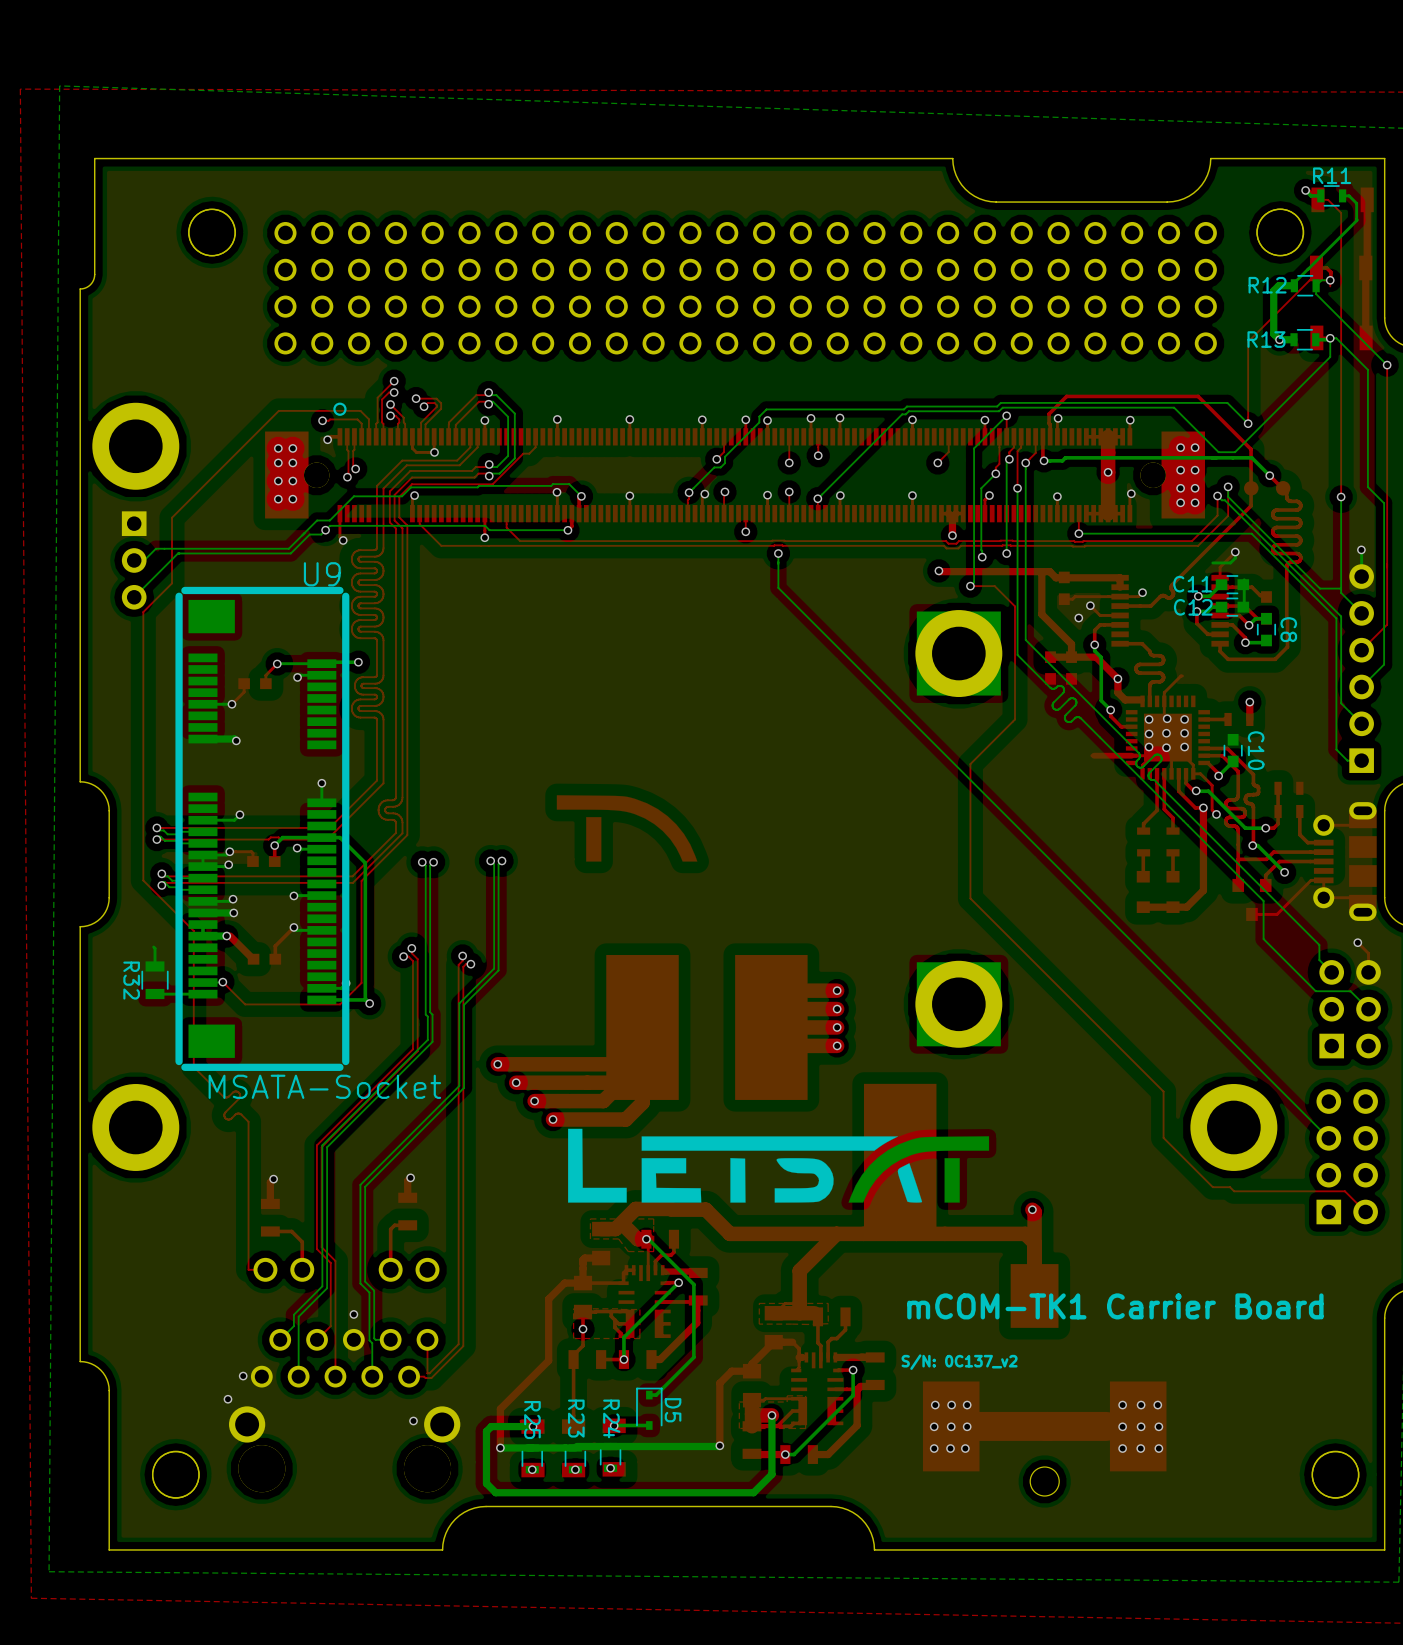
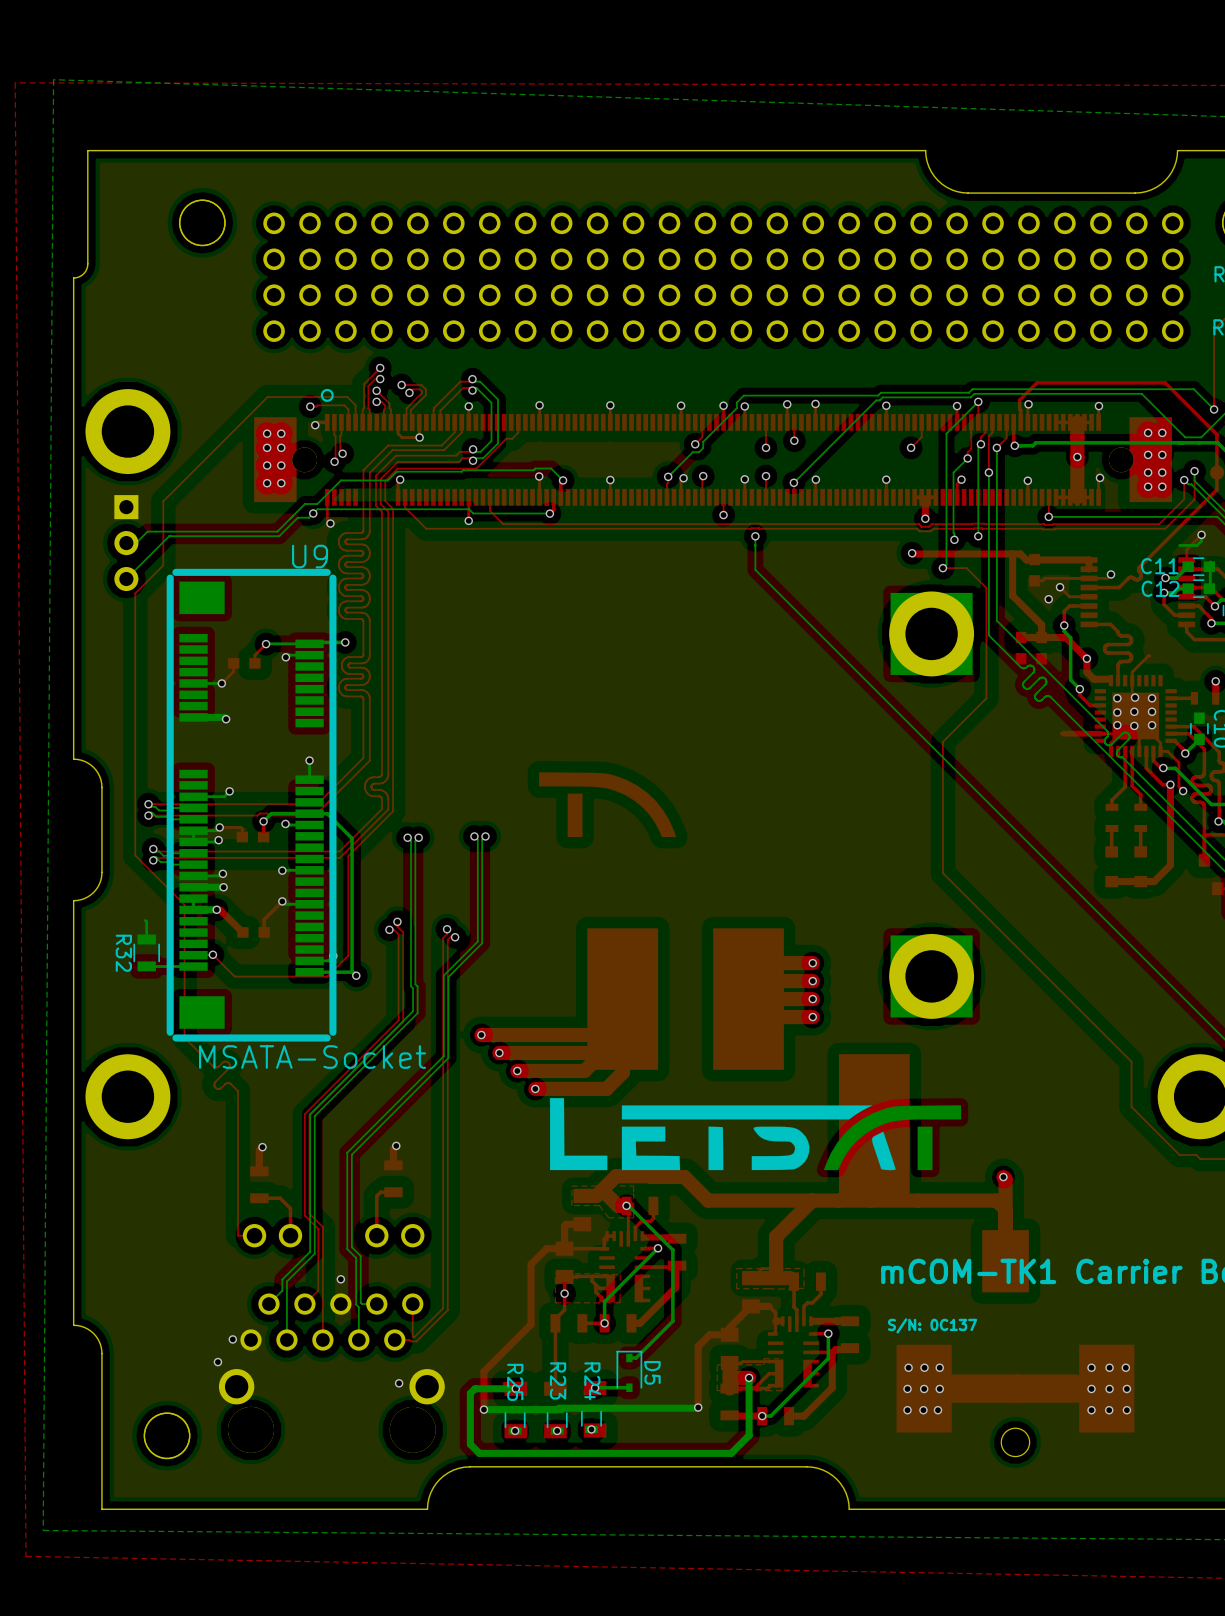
text: S/N: 0C137_v2 (959, 1362) -> S/N: 0C137 (932, 1325)

